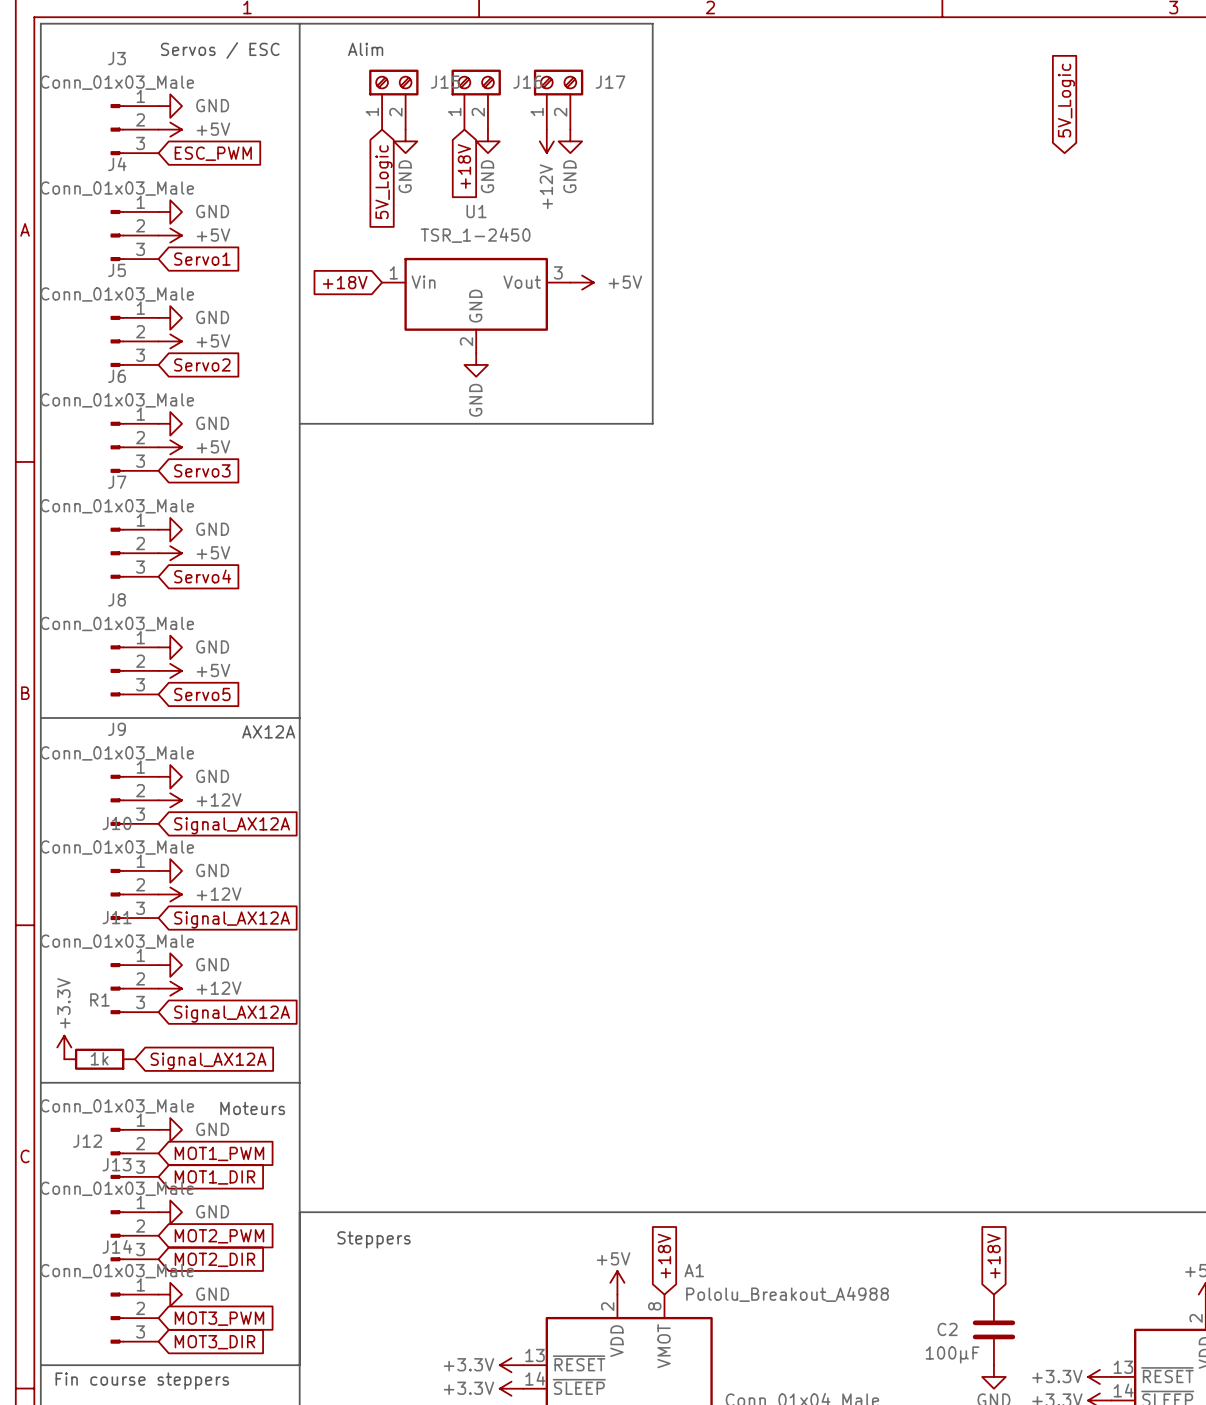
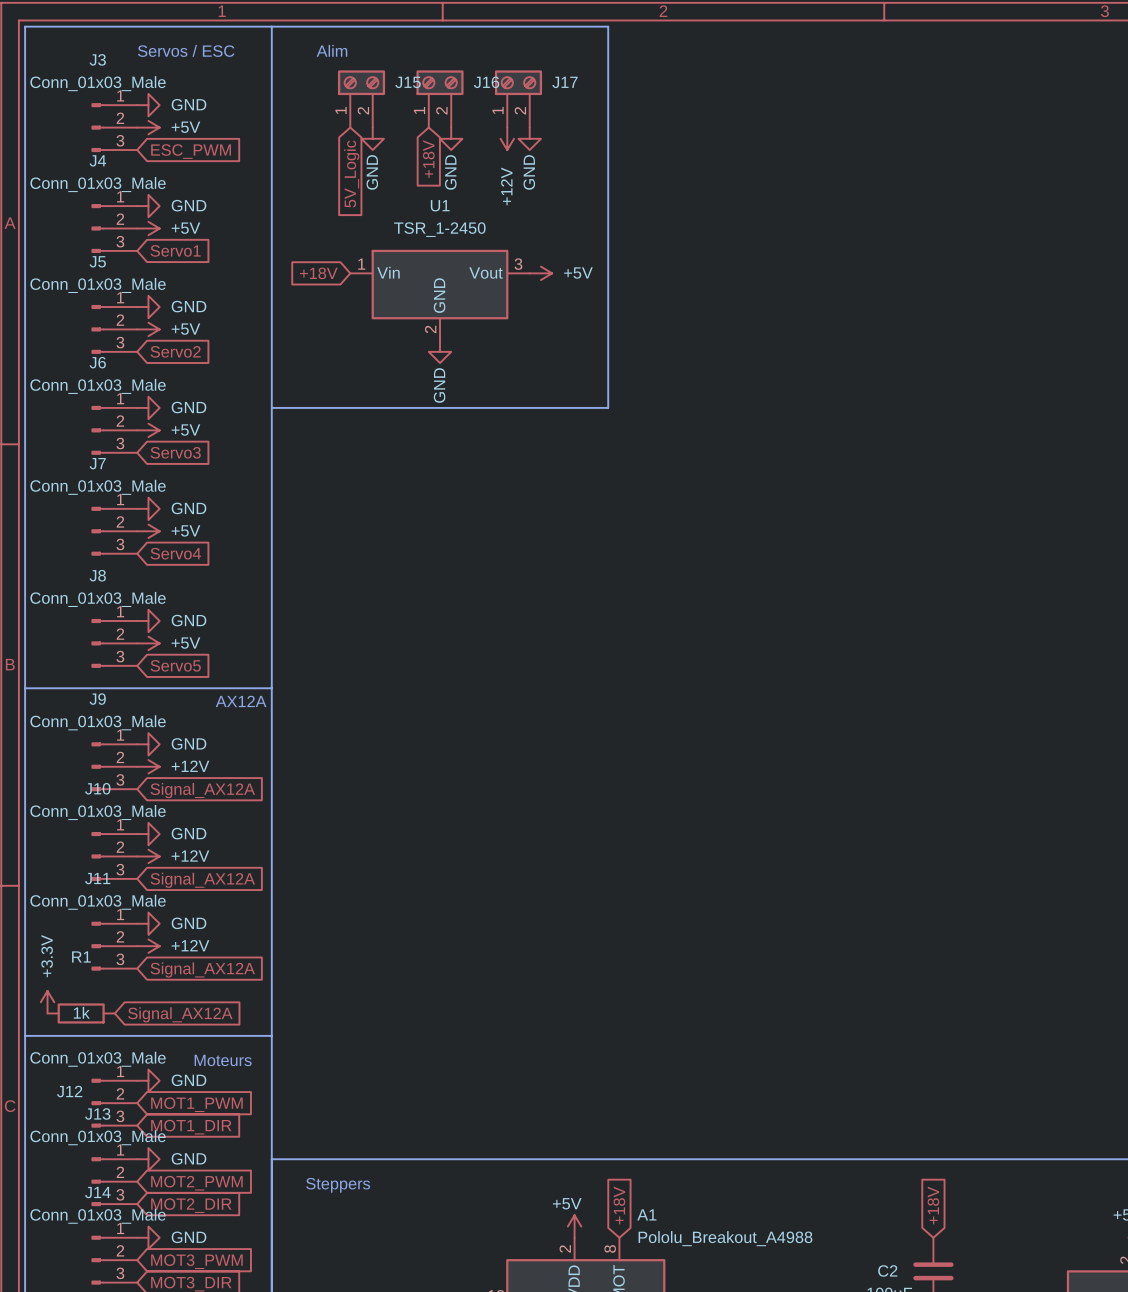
global label: 5V_Logic (1066, 100) -> none

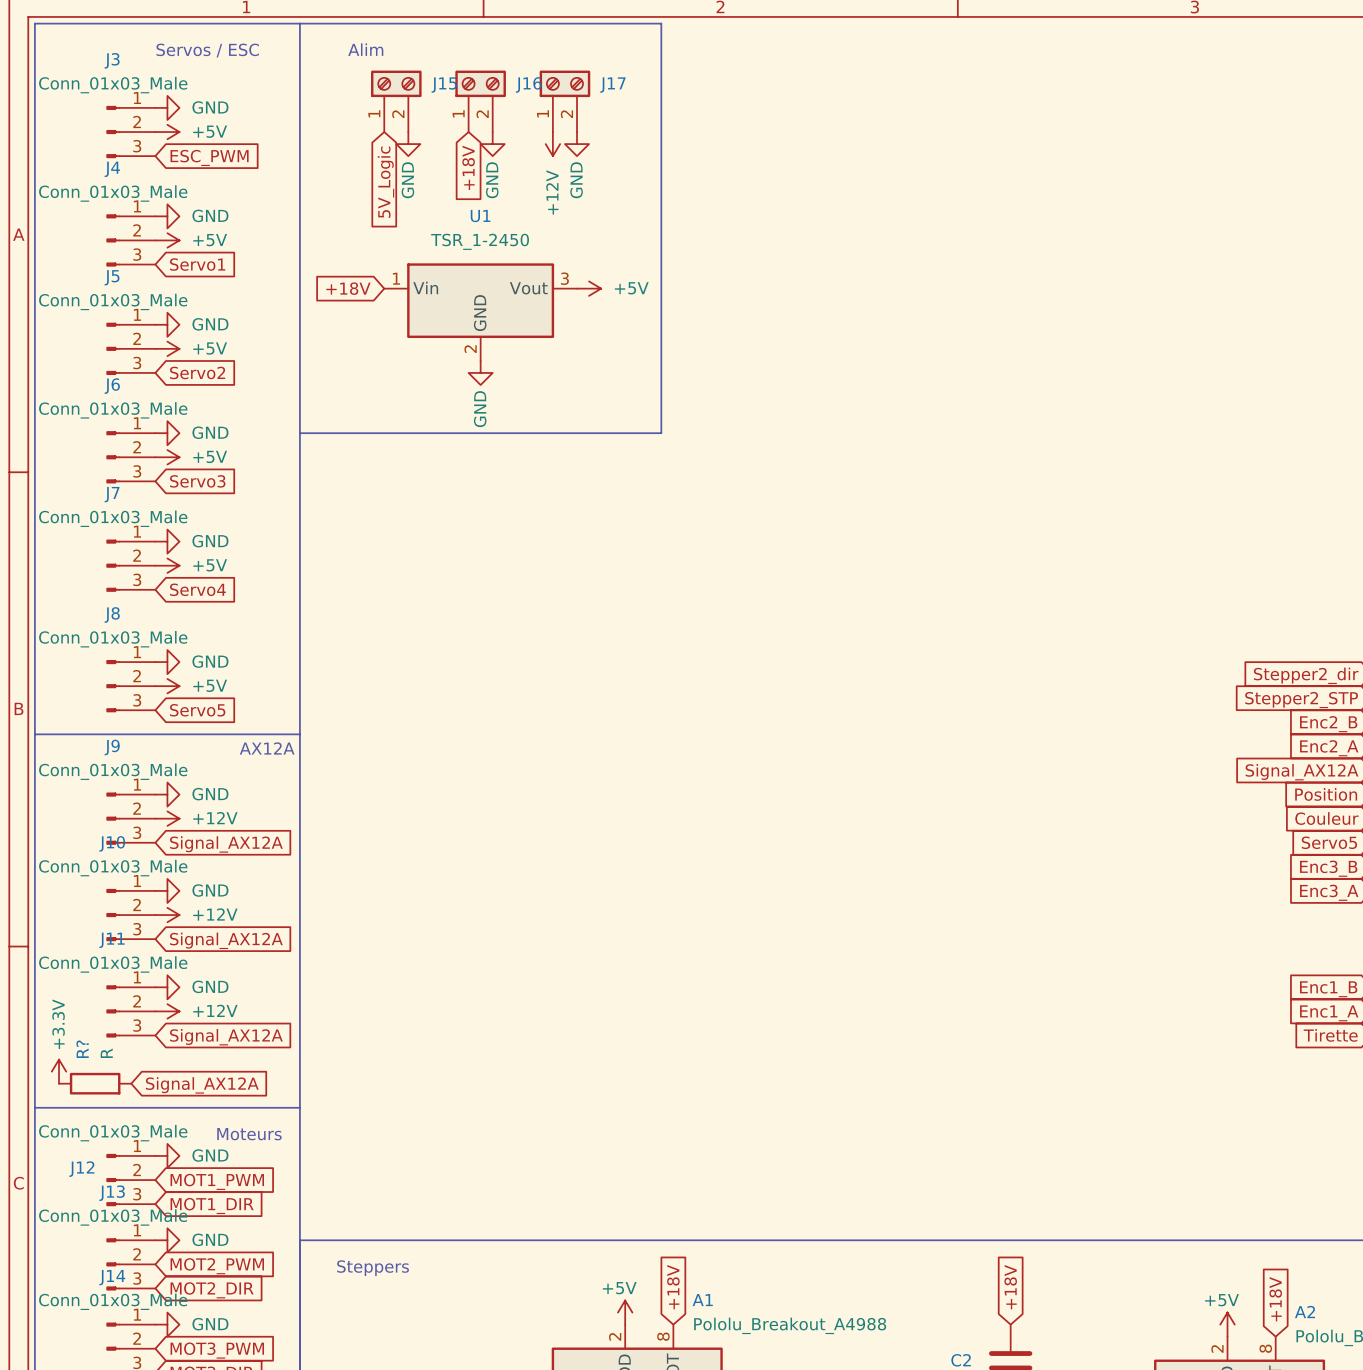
R1 name: R1 (81, 956) -> R? (82, 1049)
R1 value: 1k (81, 1012) -> R (106, 1053)

